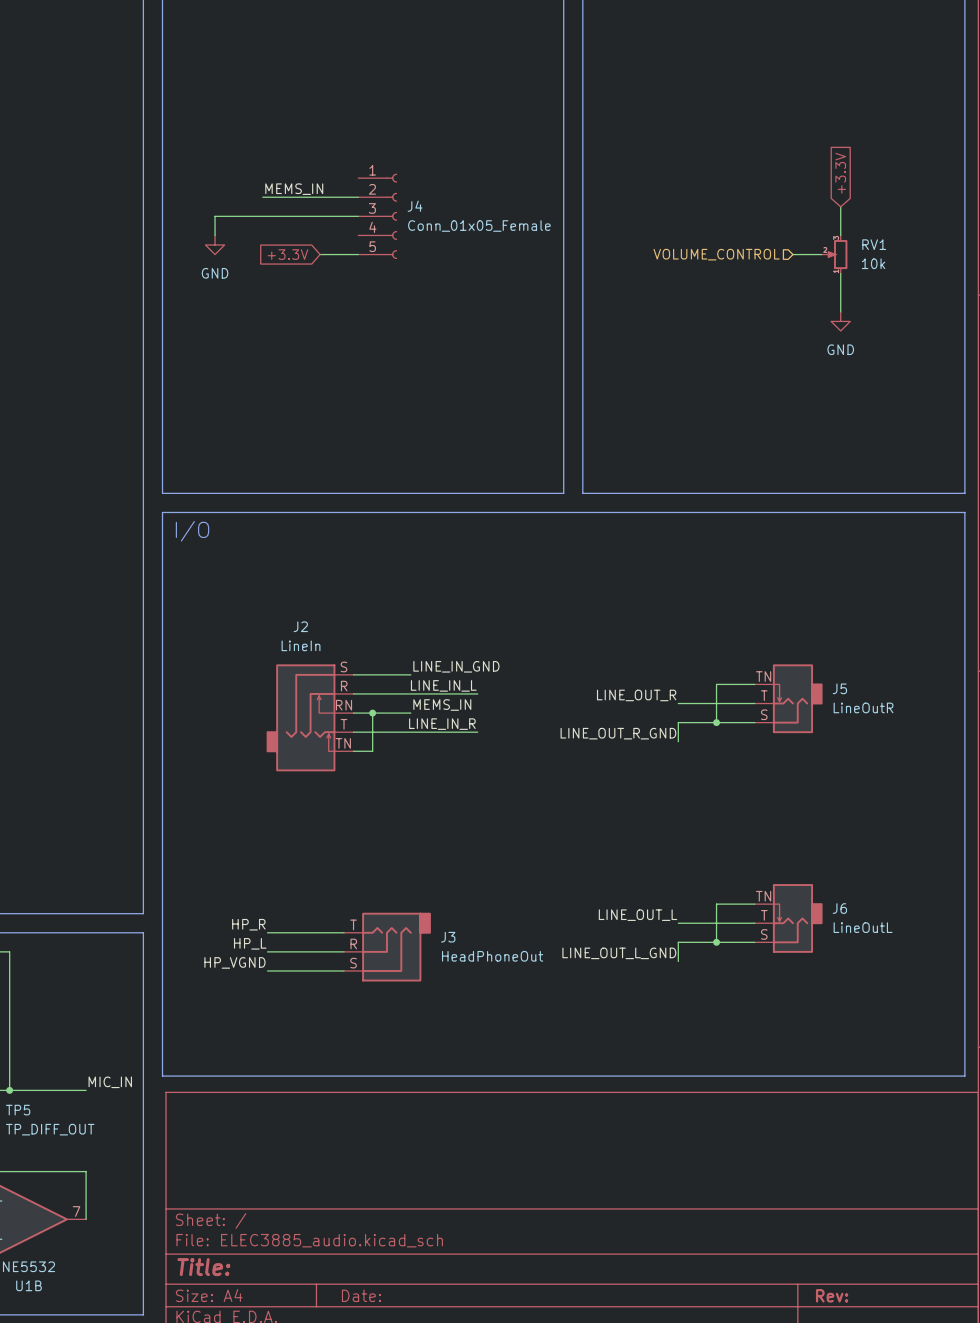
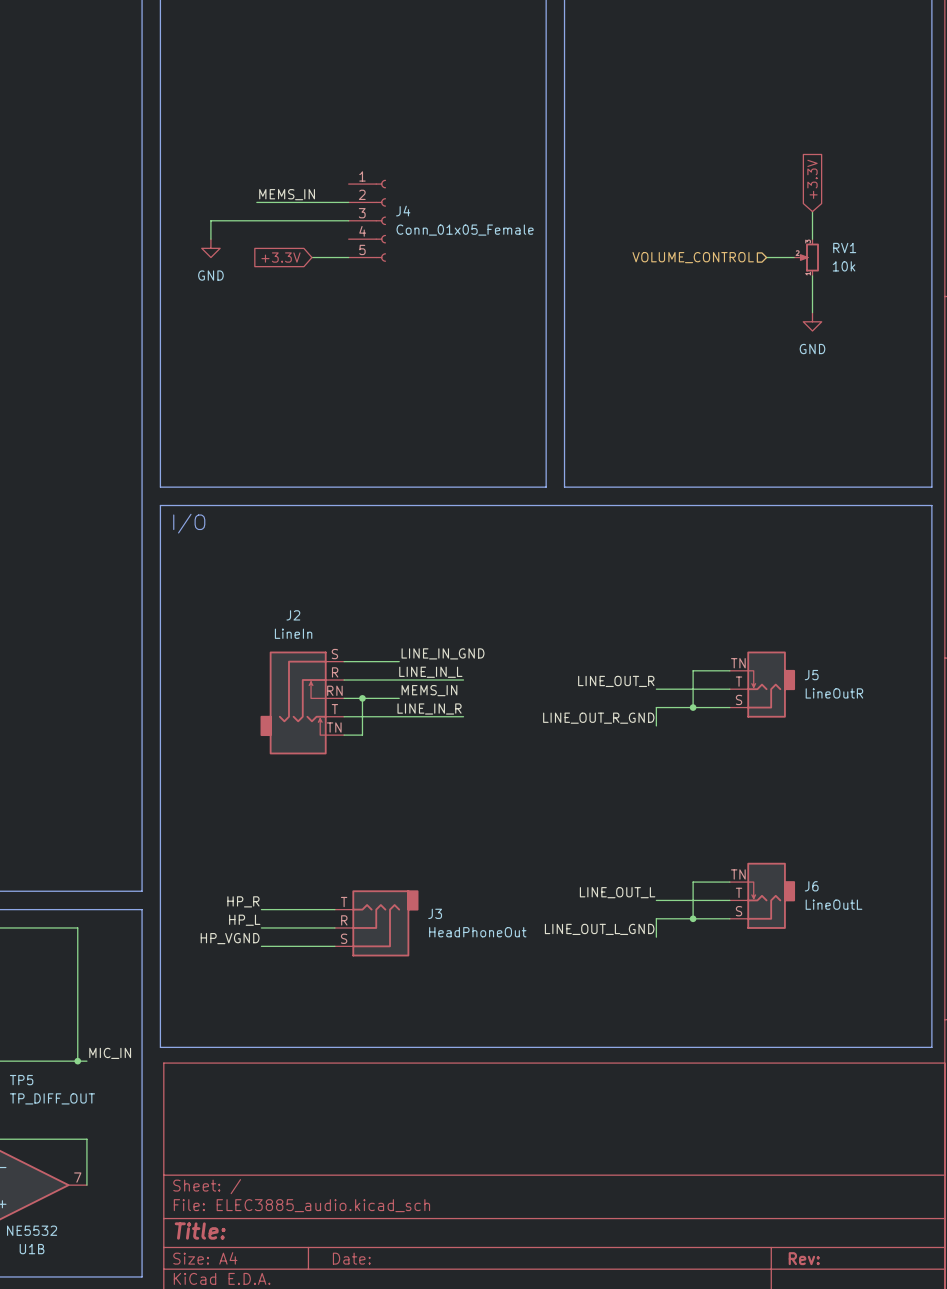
wire: (9, 951) (9, 1090) -> (13, 927) (77, 927) (77, 1061)
junction: (9, 1090) -> none
junction: none -> (77, 1061)

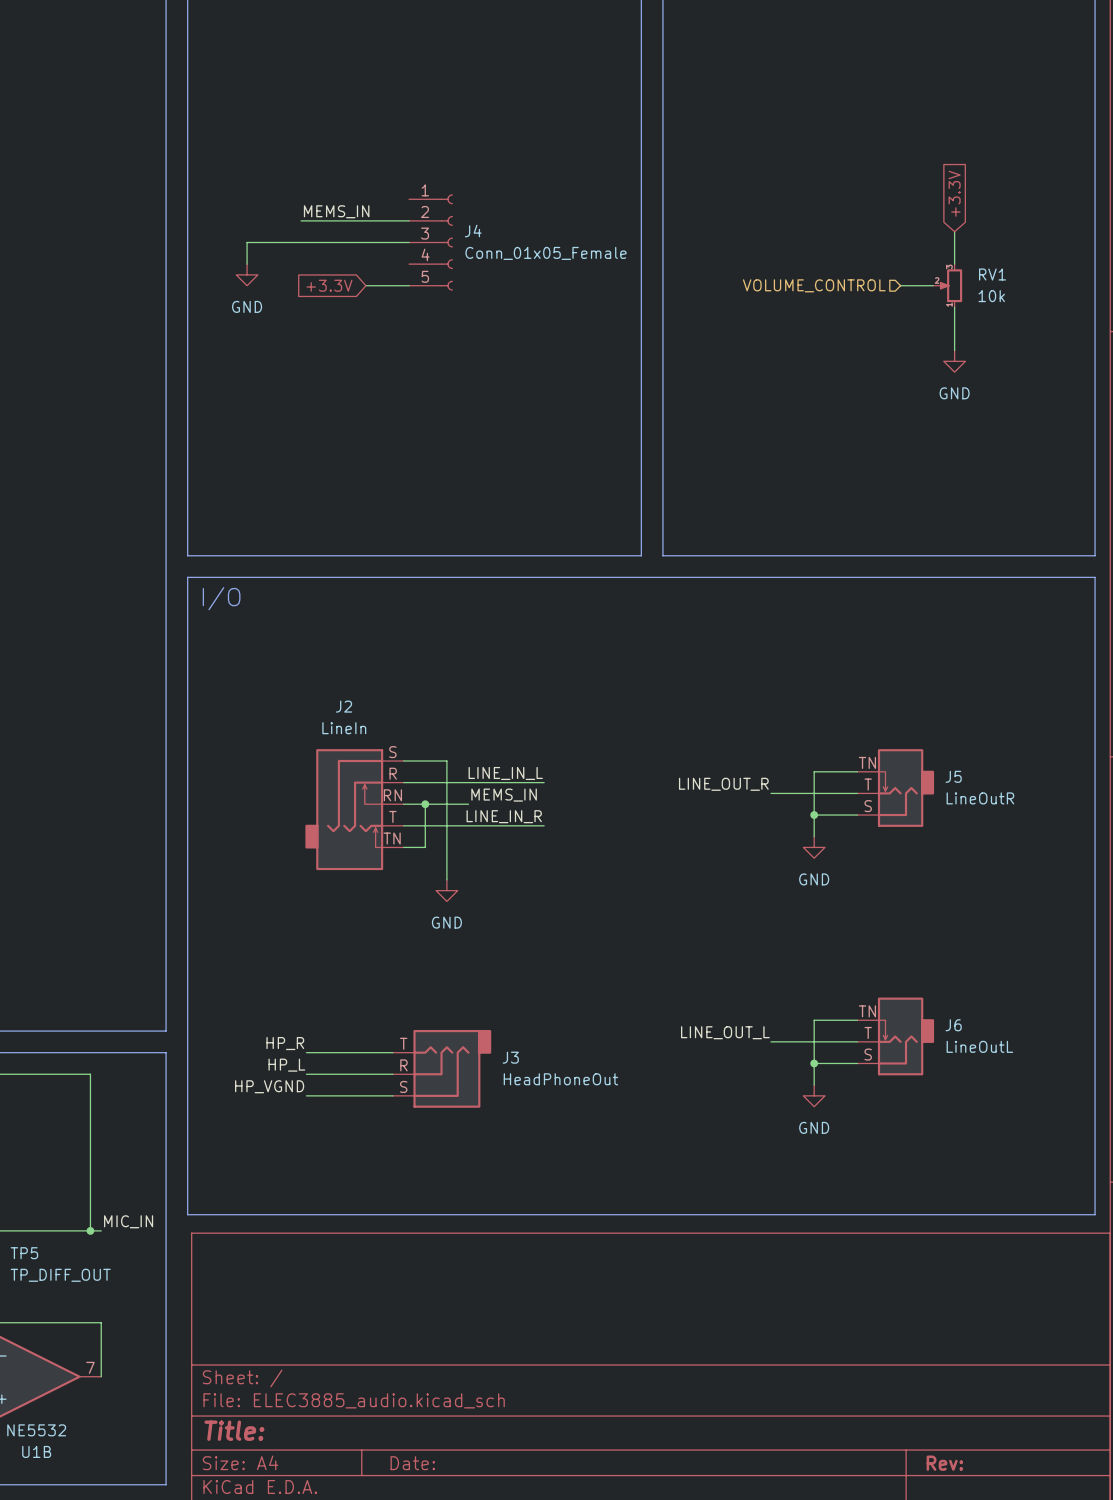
label: LINE_IN_GND (443, 653) -> none
wire: (380, 661) (399, 661) -> (446, 761) (446, 879)
wire: (693, 707) (656, 707) (656, 725) -> (814, 815) (814, 836)
label: LINE_OUT_R_GND (598, 718) -> none
power symbol: none -> GND (814, 847)
power symbol: none -> GND (446, 890)
wire: (693, 918) (656, 918) (656, 937) -> (814, 1063) (814, 1085)
label: LINE_OUT_L_GND (599, 929) -> none
power symbol: none -> GND (814, 1095)

